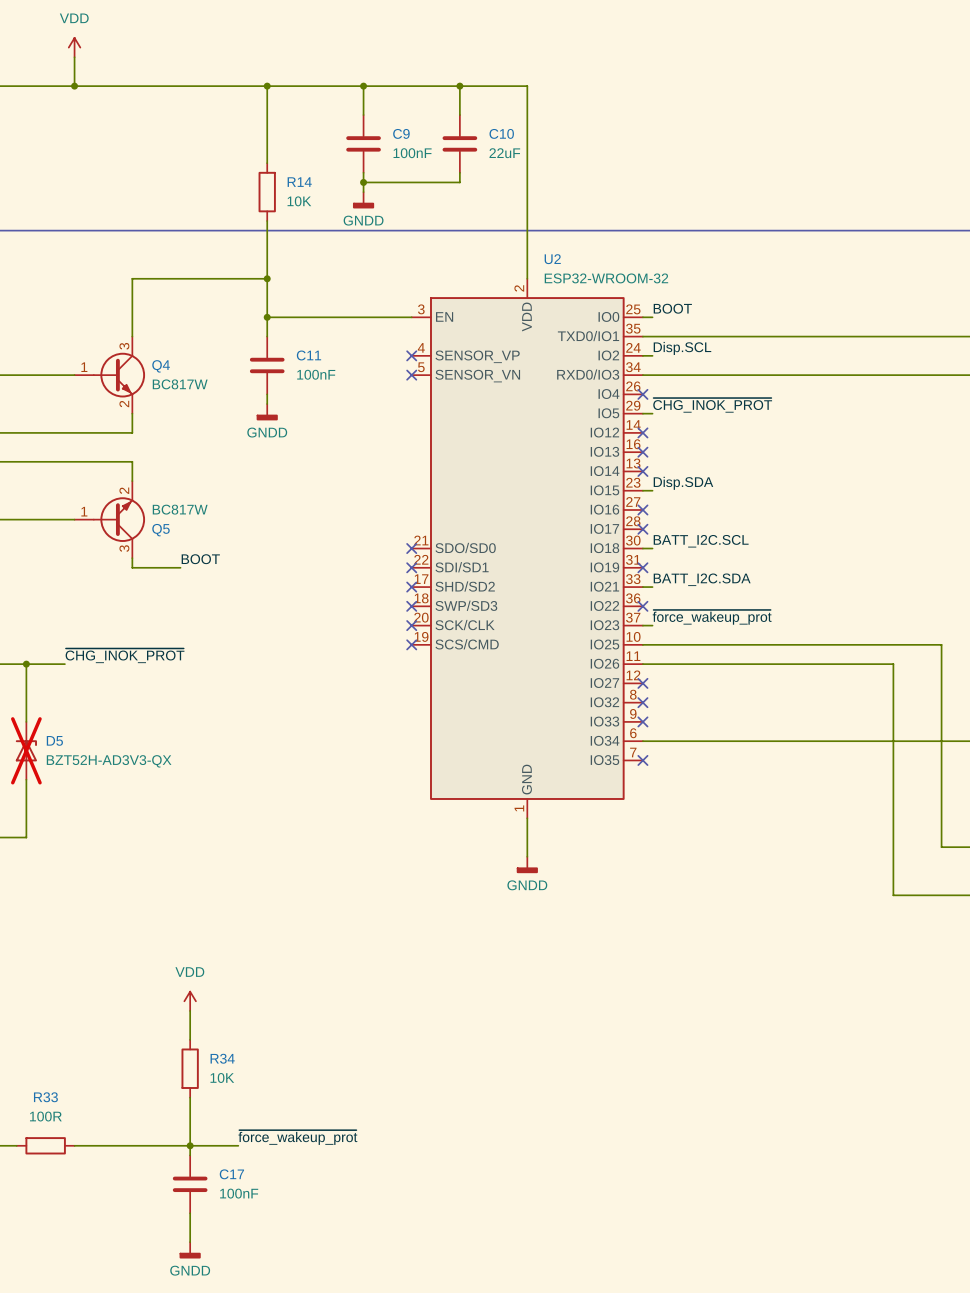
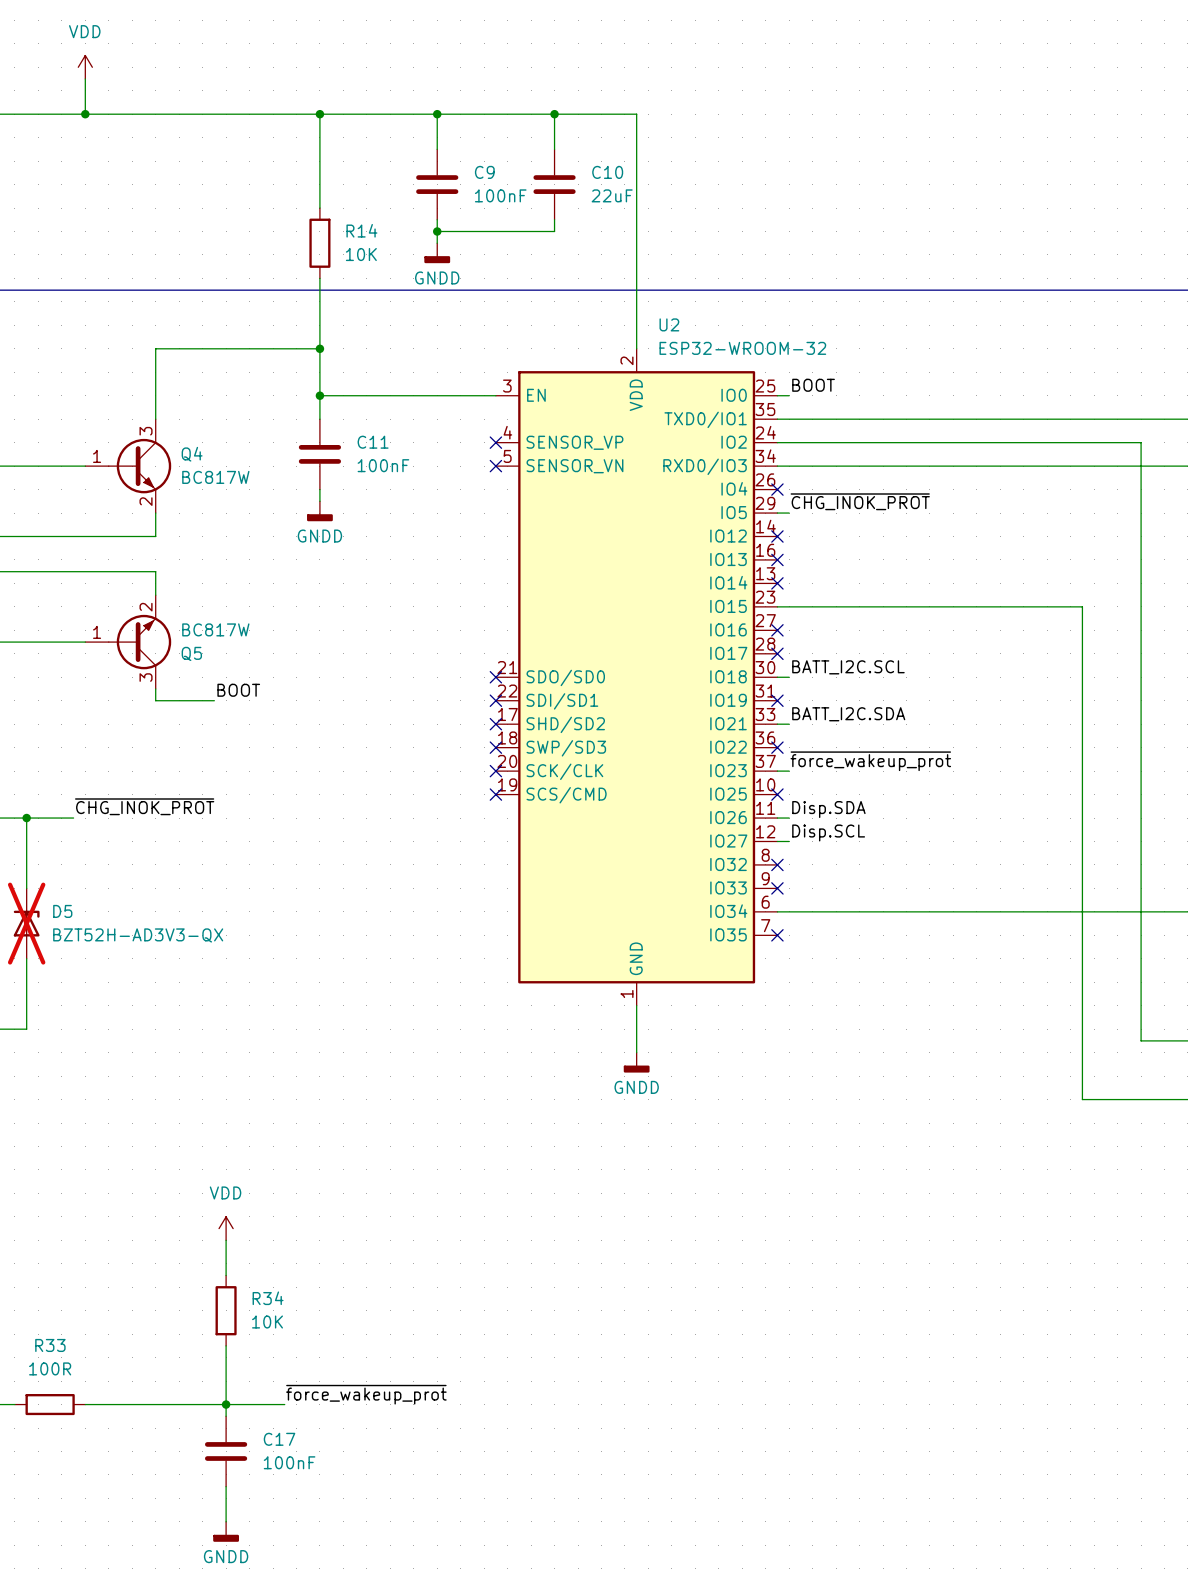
label: Disp.SCL (682, 348) -> none
label position: Disp.SDA (683, 483) -> Disp.SDA (828, 809)
wire: (642, 644) (941, 644) -> (789, 442) (1141, 442) (1141, 794)
wire: (652, 664) (893, 664) -> (789, 606) (1082, 606) (1082, 818)
label: none -> Disp.SCL (828, 832)
wire: none -> (777, 841) (789, 841)
no-connect mark position: (642, 683) -> (777, 794)

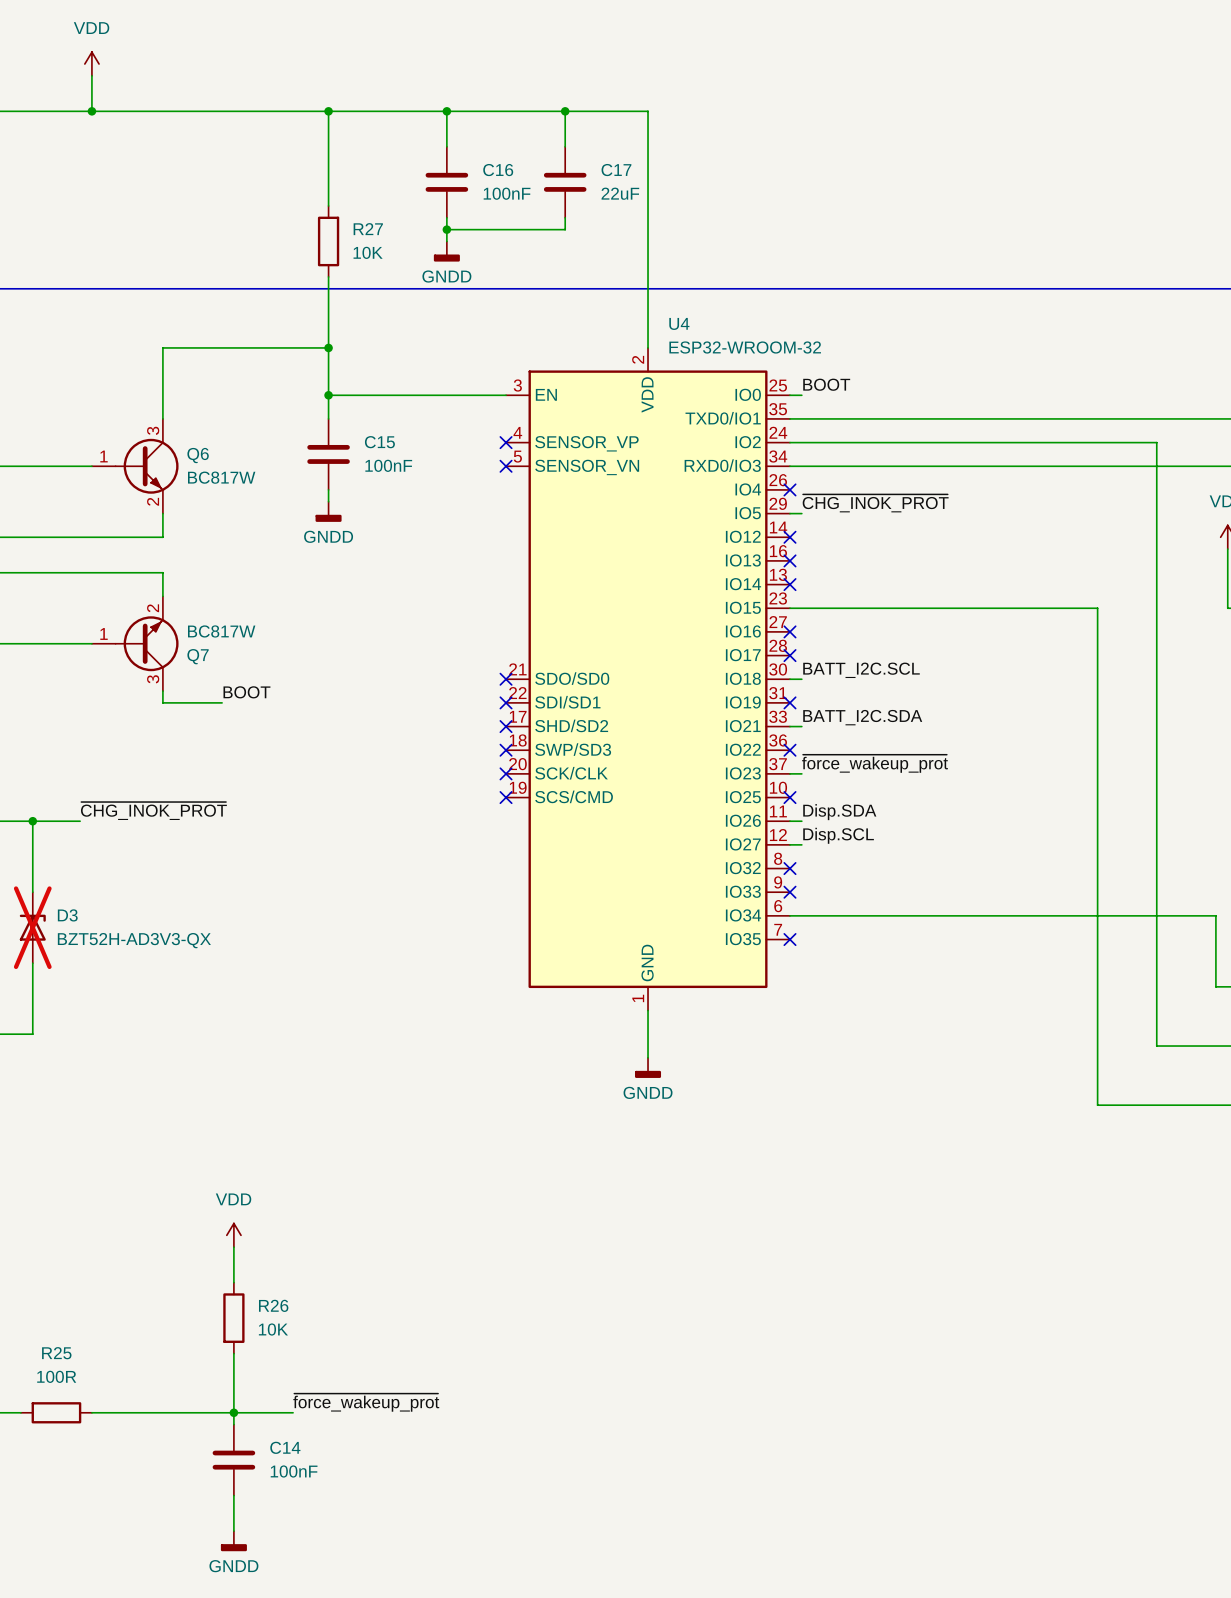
C9 name: C9 (484, 172) -> C16 (498, 170)
C10 name: C10 (607, 172) -> C17 (616, 170)
R14 name: R14 (361, 230) -> R27 (368, 229)
U2 name: U2 (669, 324) -> U4 (679, 323)
C11 name: C11 (373, 442) -> C15 (379, 442)
Q4 name: Q4 (192, 454) -> Q6 (198, 455)
Q5 name: Q5 (191, 653) -> Q7 (198, 656)
D5 name: D5 (62, 911) -> D3 (67, 915)
R34 name: R34 (268, 1298) -> R26 (273, 1305)
R33 name: R33 (50, 1345) -> R25 (56, 1353)
C17 name: C17 (279, 1439) -> C14 (285, 1447)

